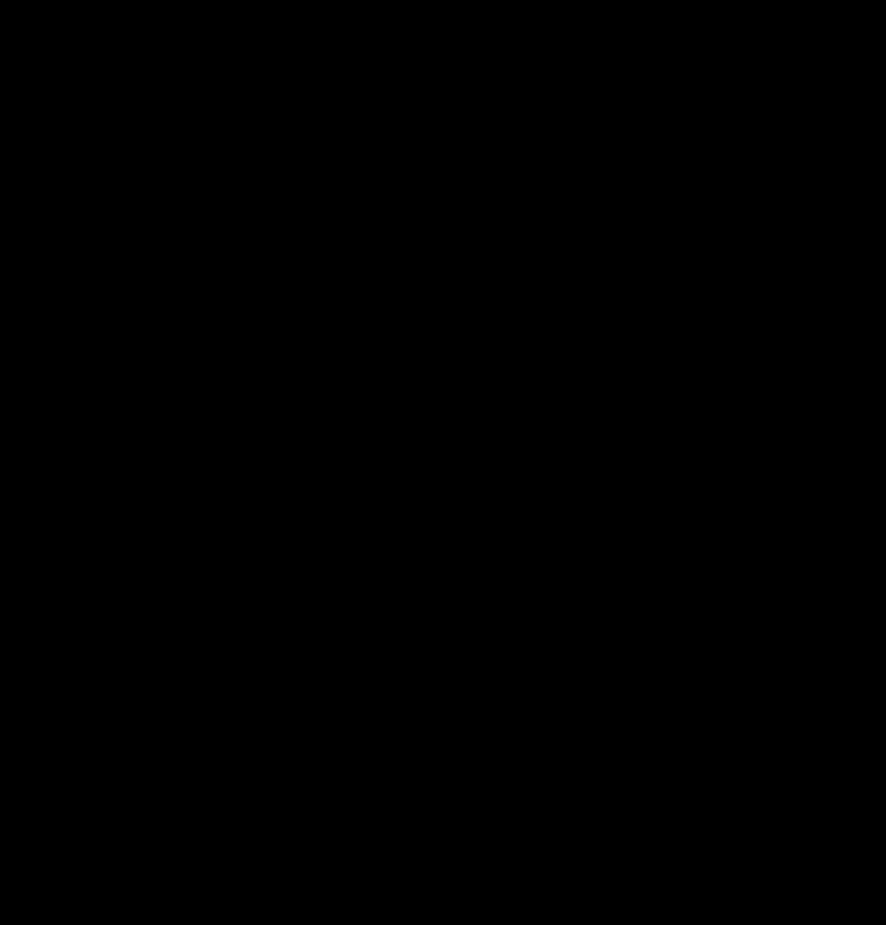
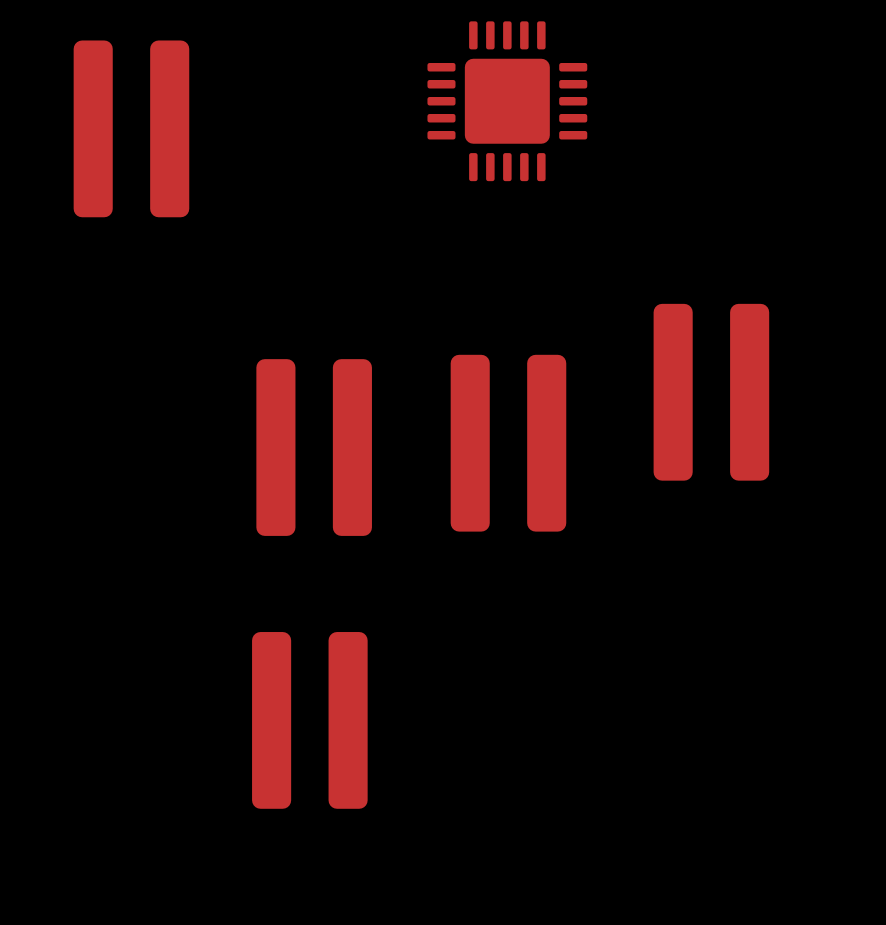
part: none -> (507, 101)
part: none -> (131, 128)
part: none -> (711, 392)
part: none -> (508, 443)
part: none -> (314, 447)
part: none -> (309, 720)

